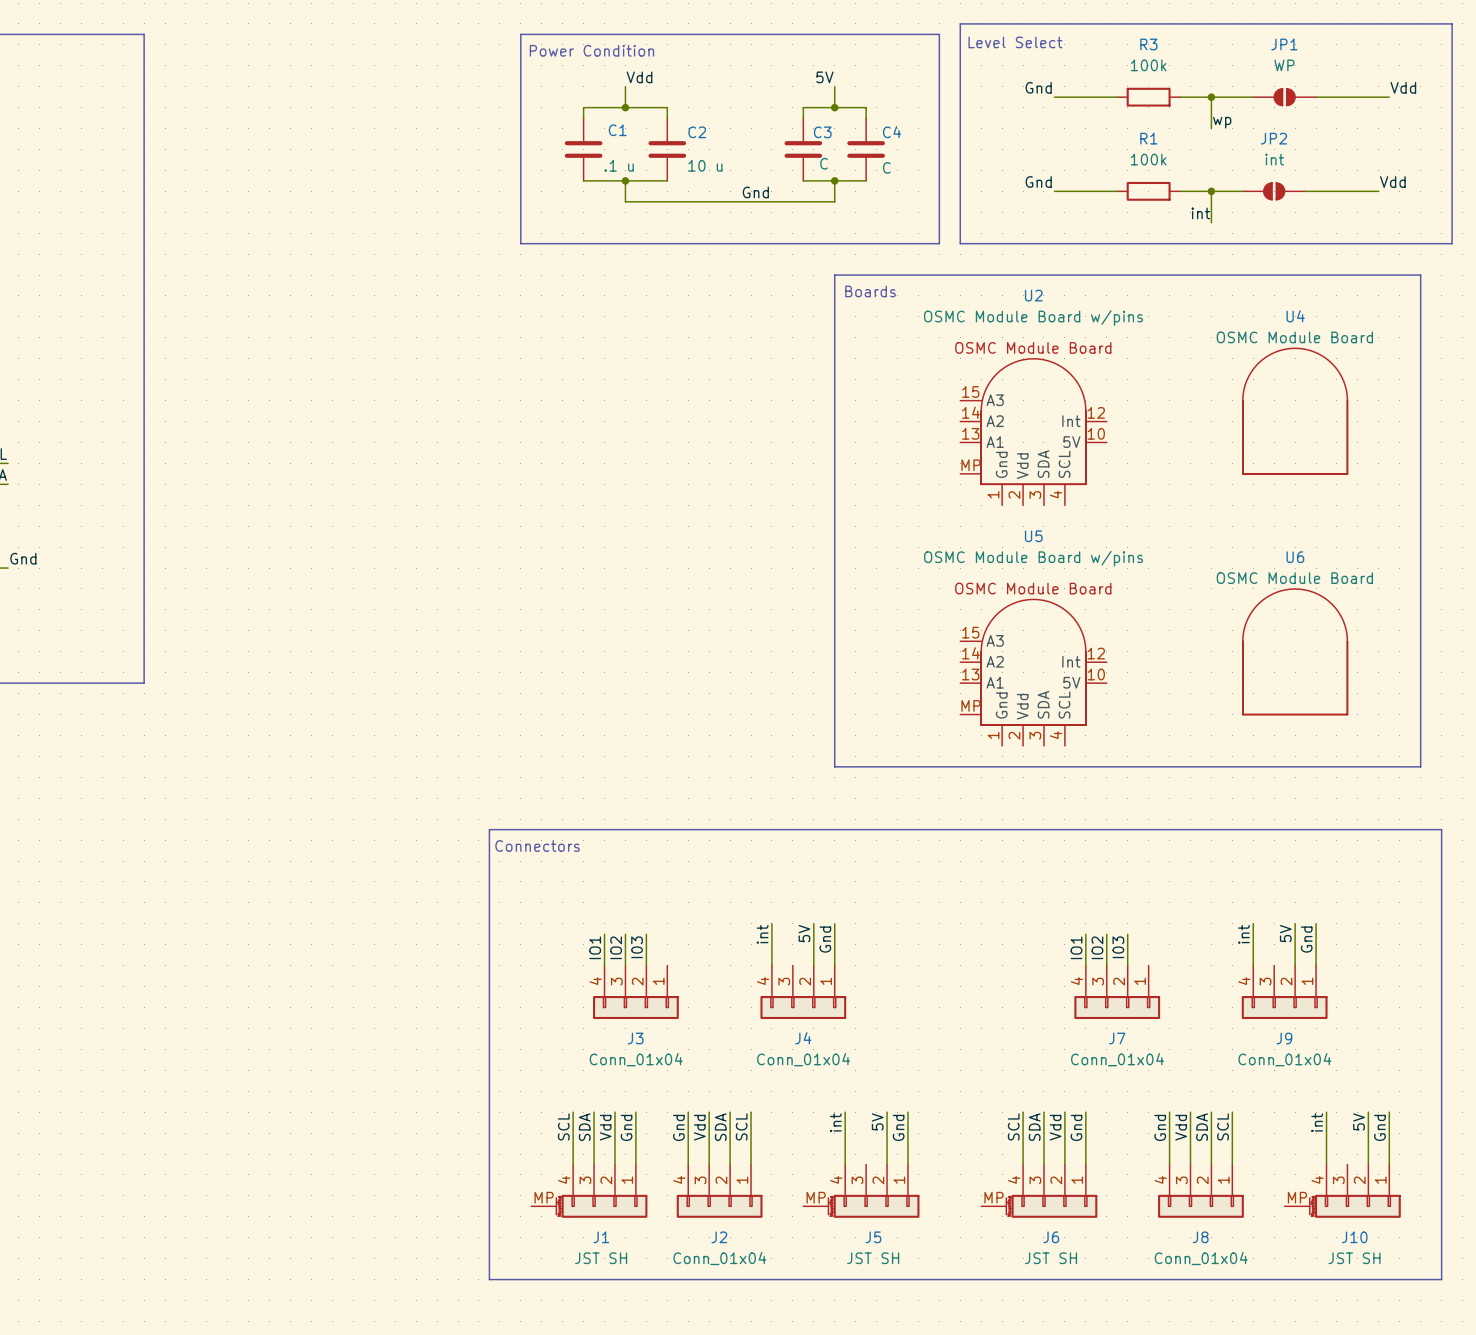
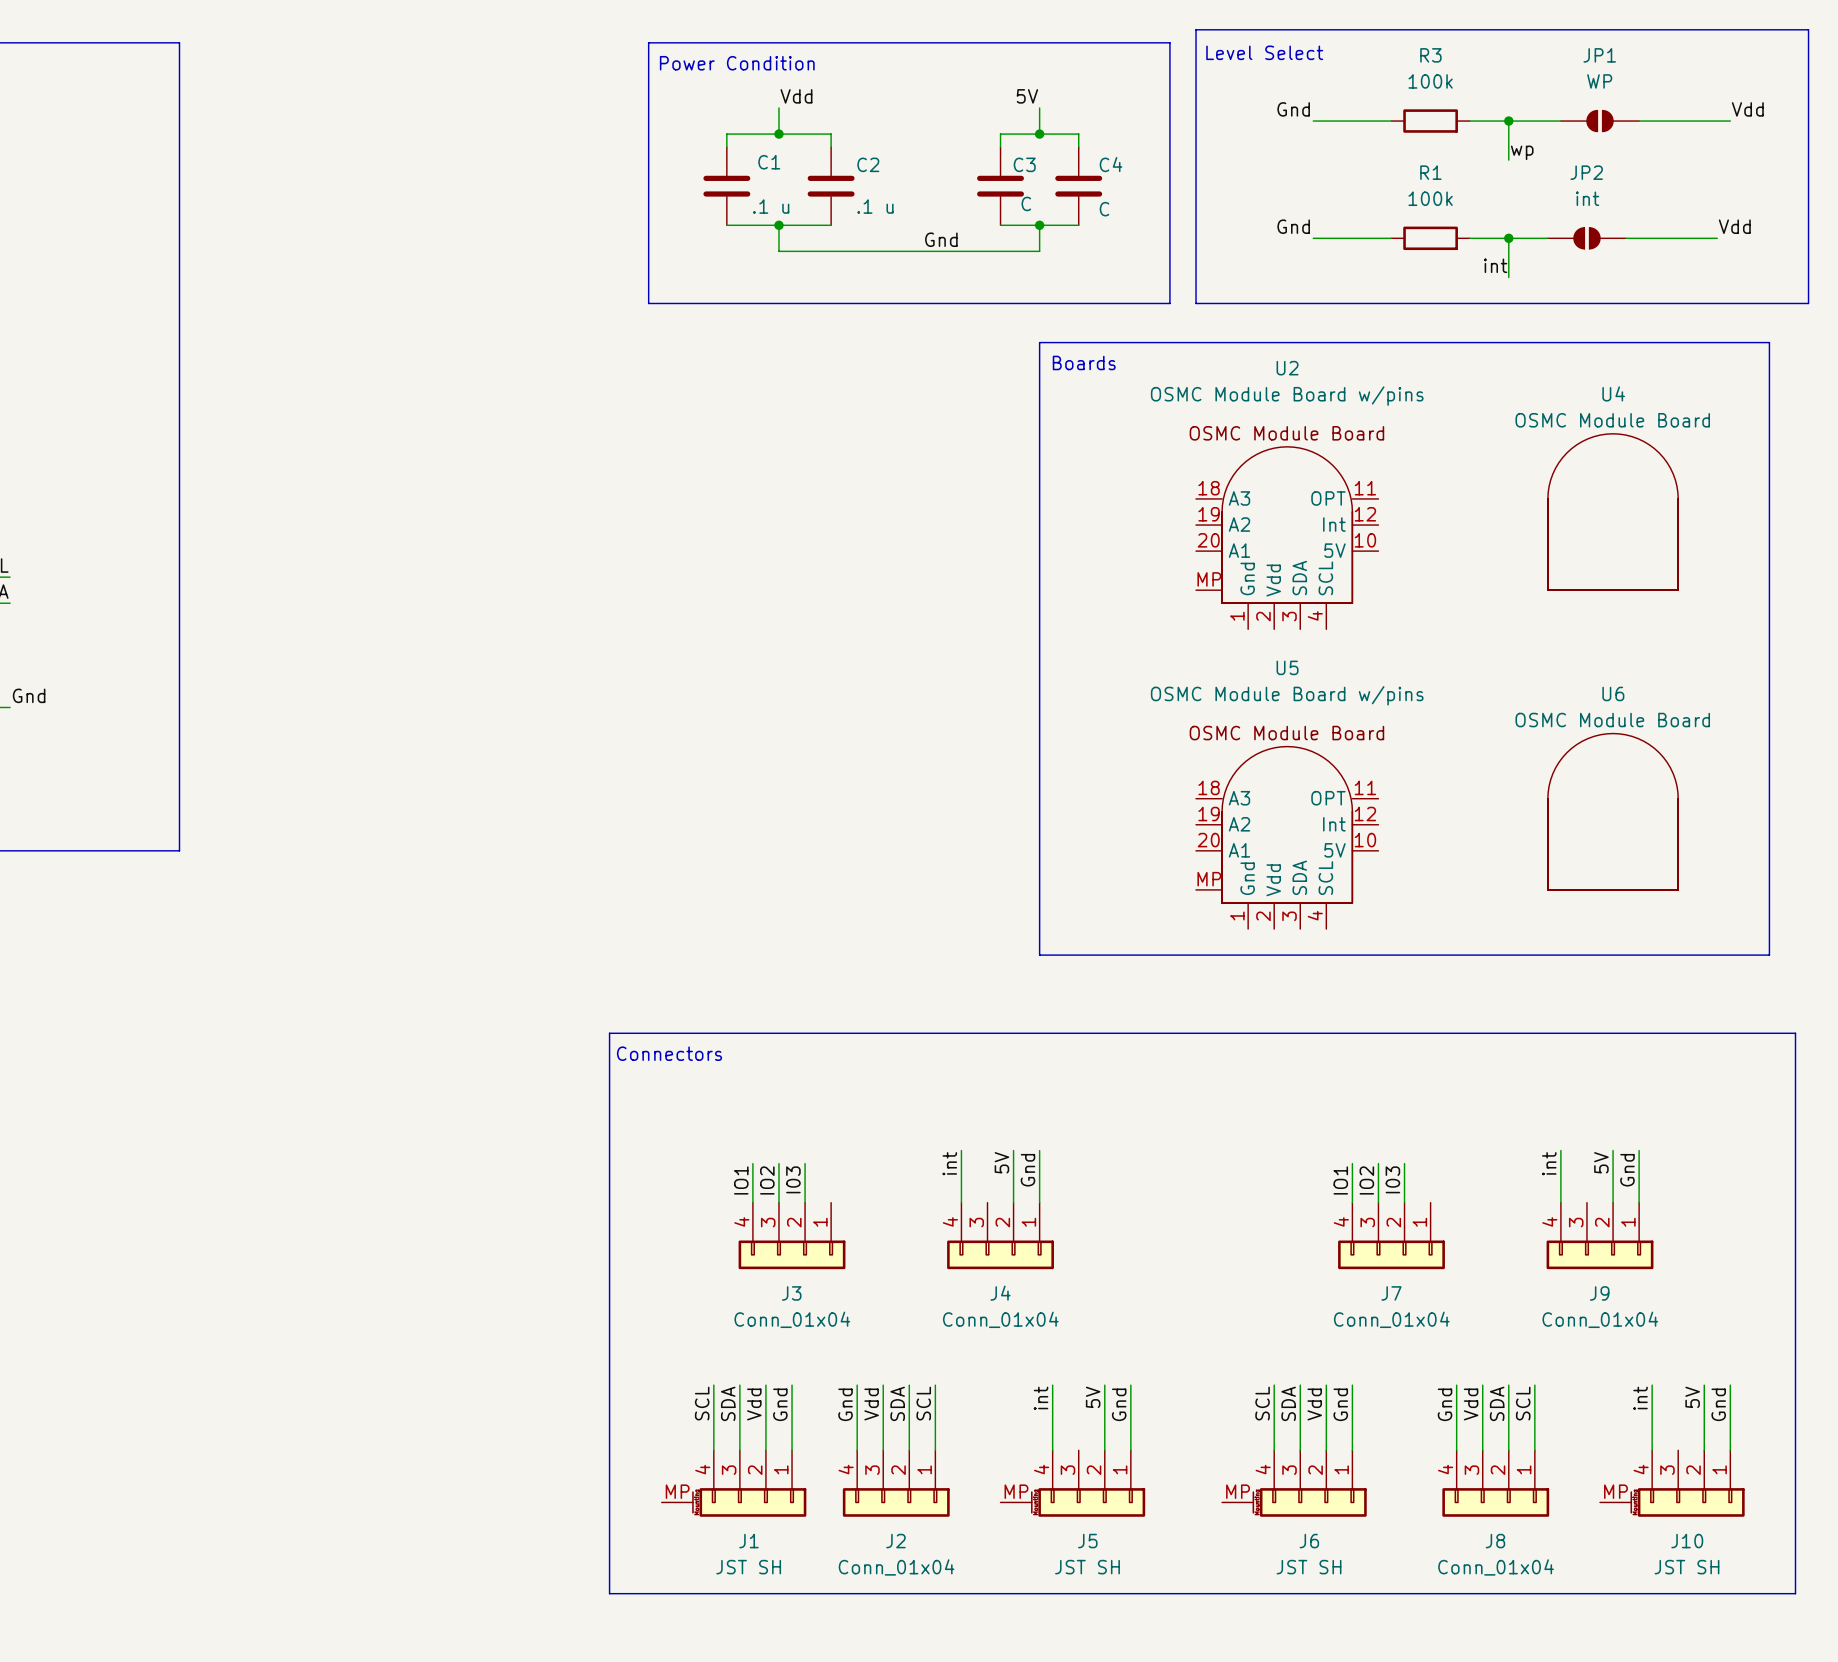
C2 value: 10 u (705, 165) -> .1 u (875, 206)
U2 symbol: [960, 358, 1107, 506] -> [1196, 446, 1379, 630]
U5 symbol: [960, 599, 1107, 746] -> [1196, 746, 1379, 930]

